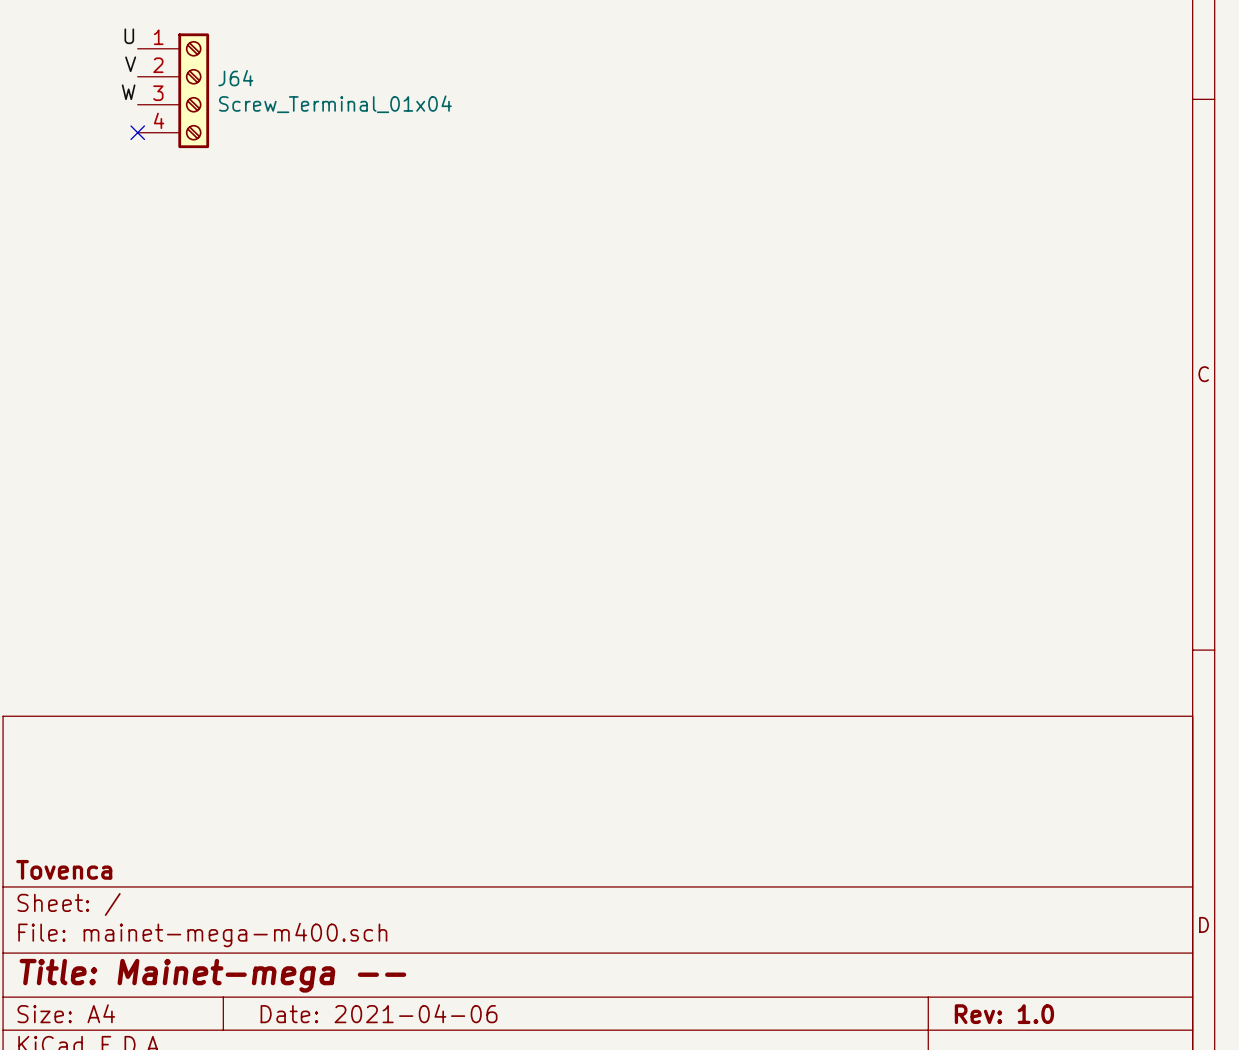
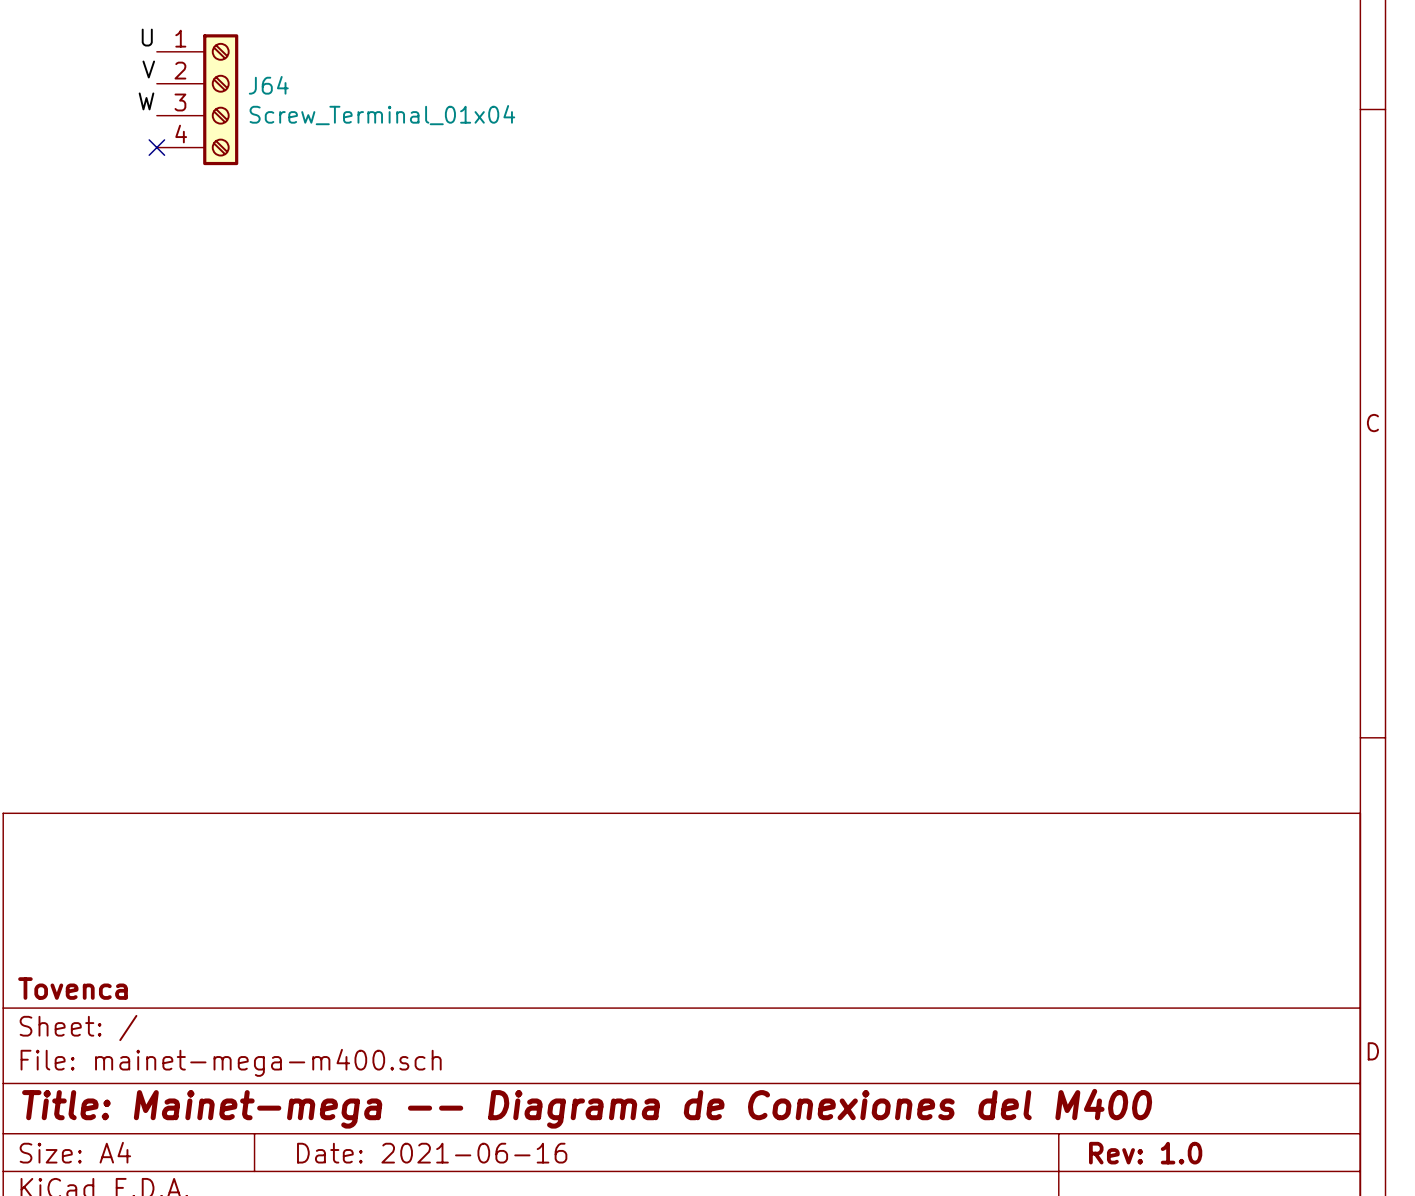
title block: Title: Mainet-mega -- (212, 975) -> Title: Mainet-mega -- Diagrama de Conexiones del M400 (587, 1108)
title block: Date: 2021-04-06 (379, 1013) -> Date: 2021-06-16 (432, 1153)

